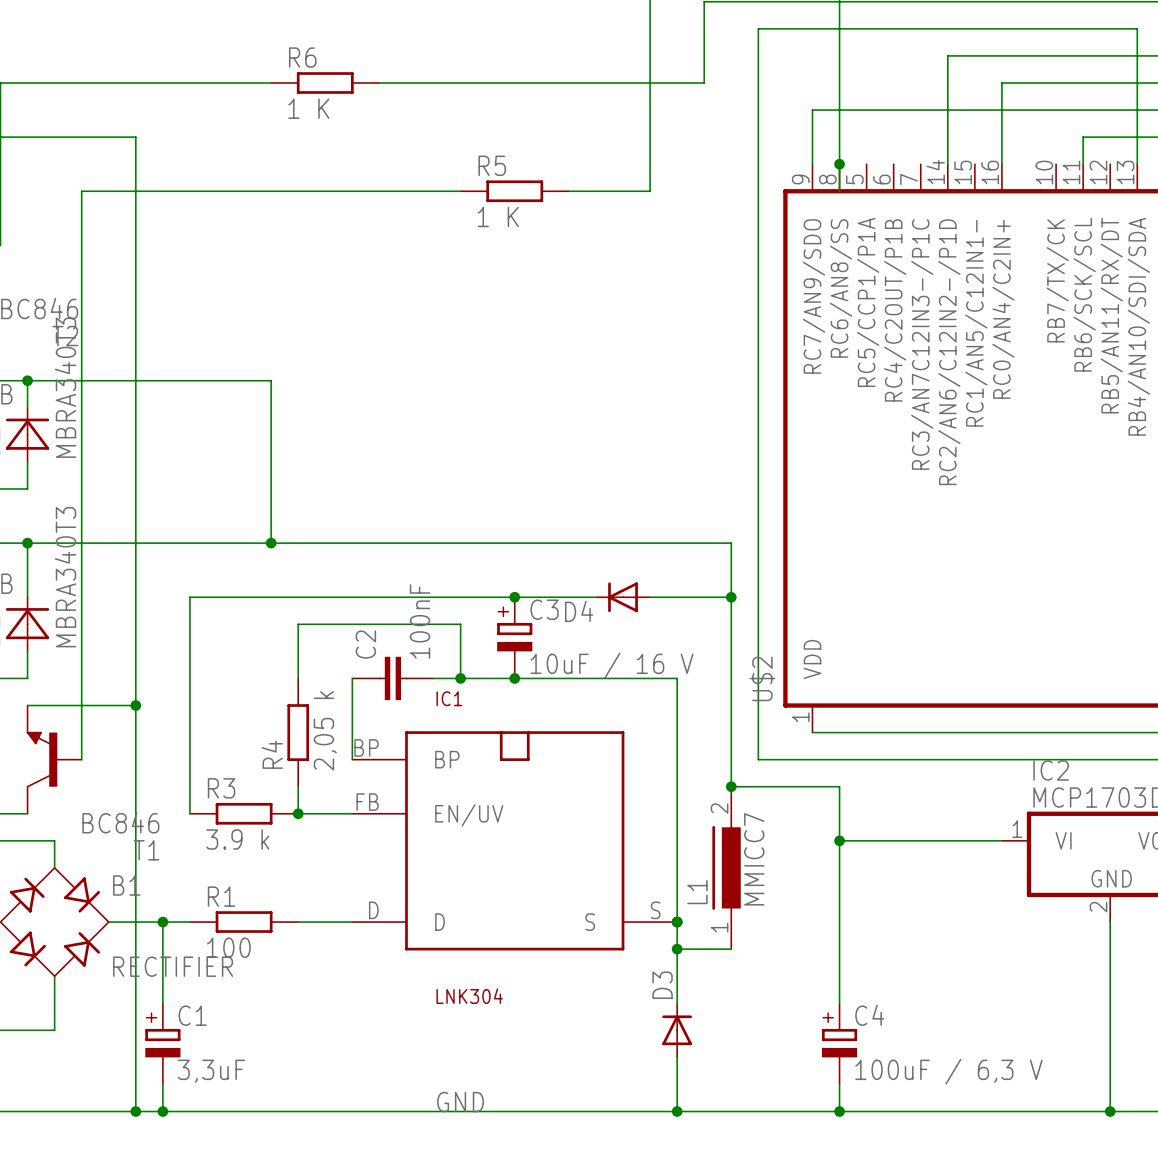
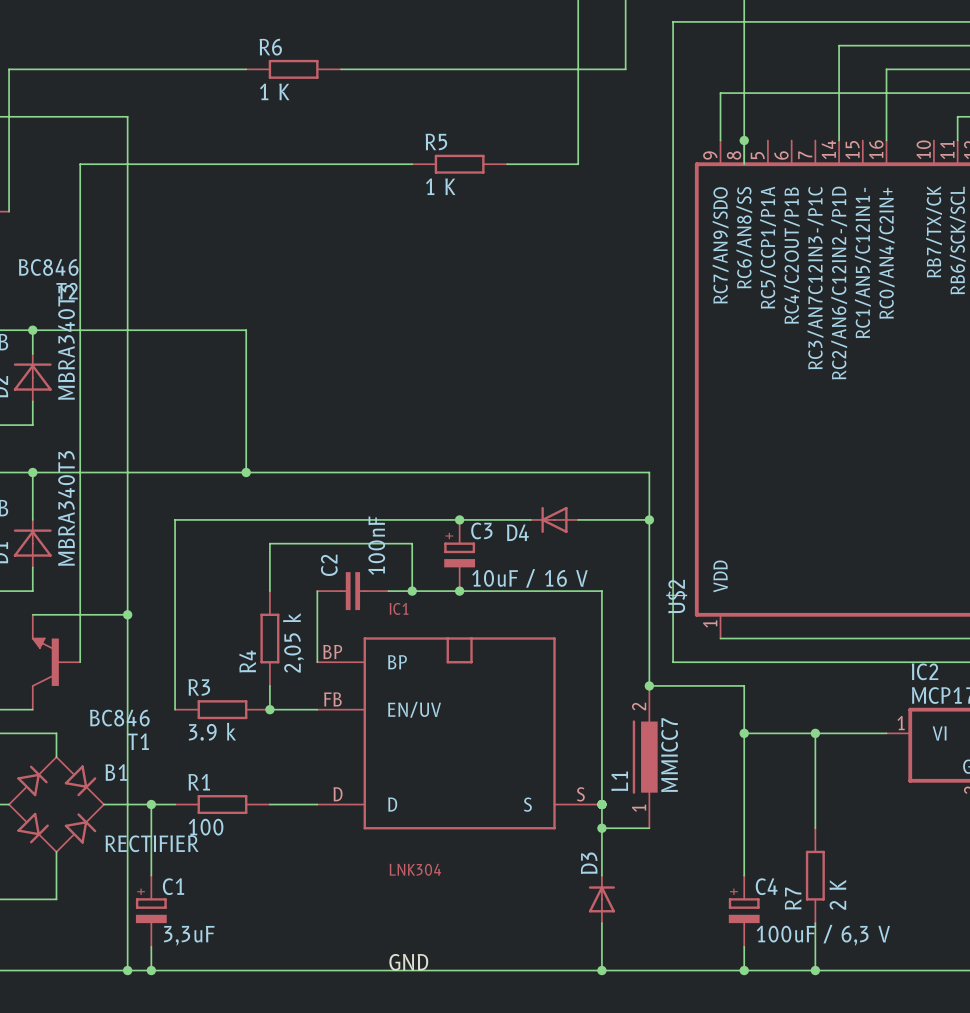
wire: none -> (815, 733) (815, 828)
junction: none -> (815, 733)
R7: none -> 2 K (815, 875)
wire: none -> (815, 923) (815, 970)
junction: none -> (815, 970)

